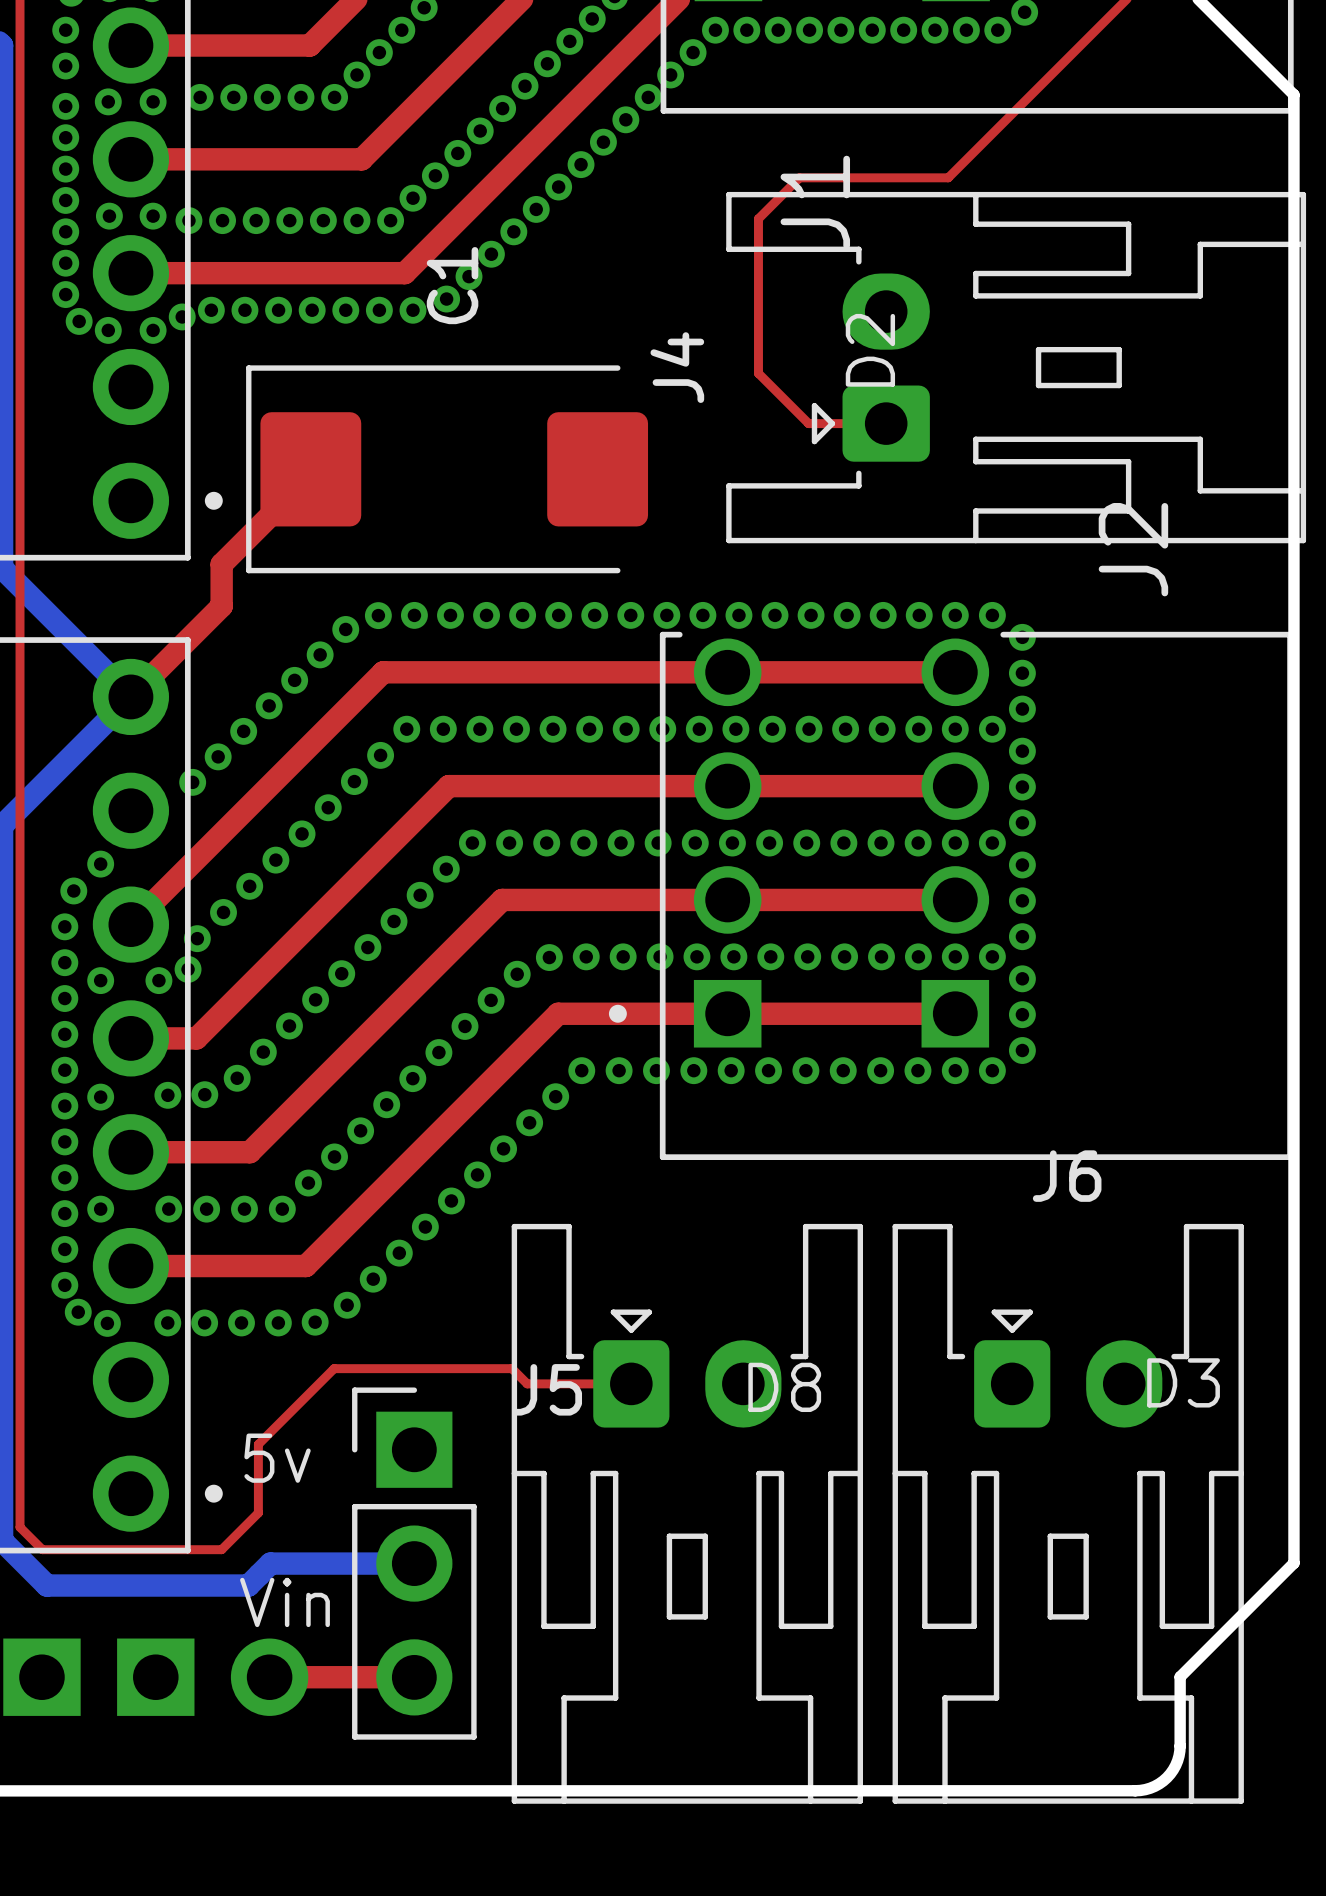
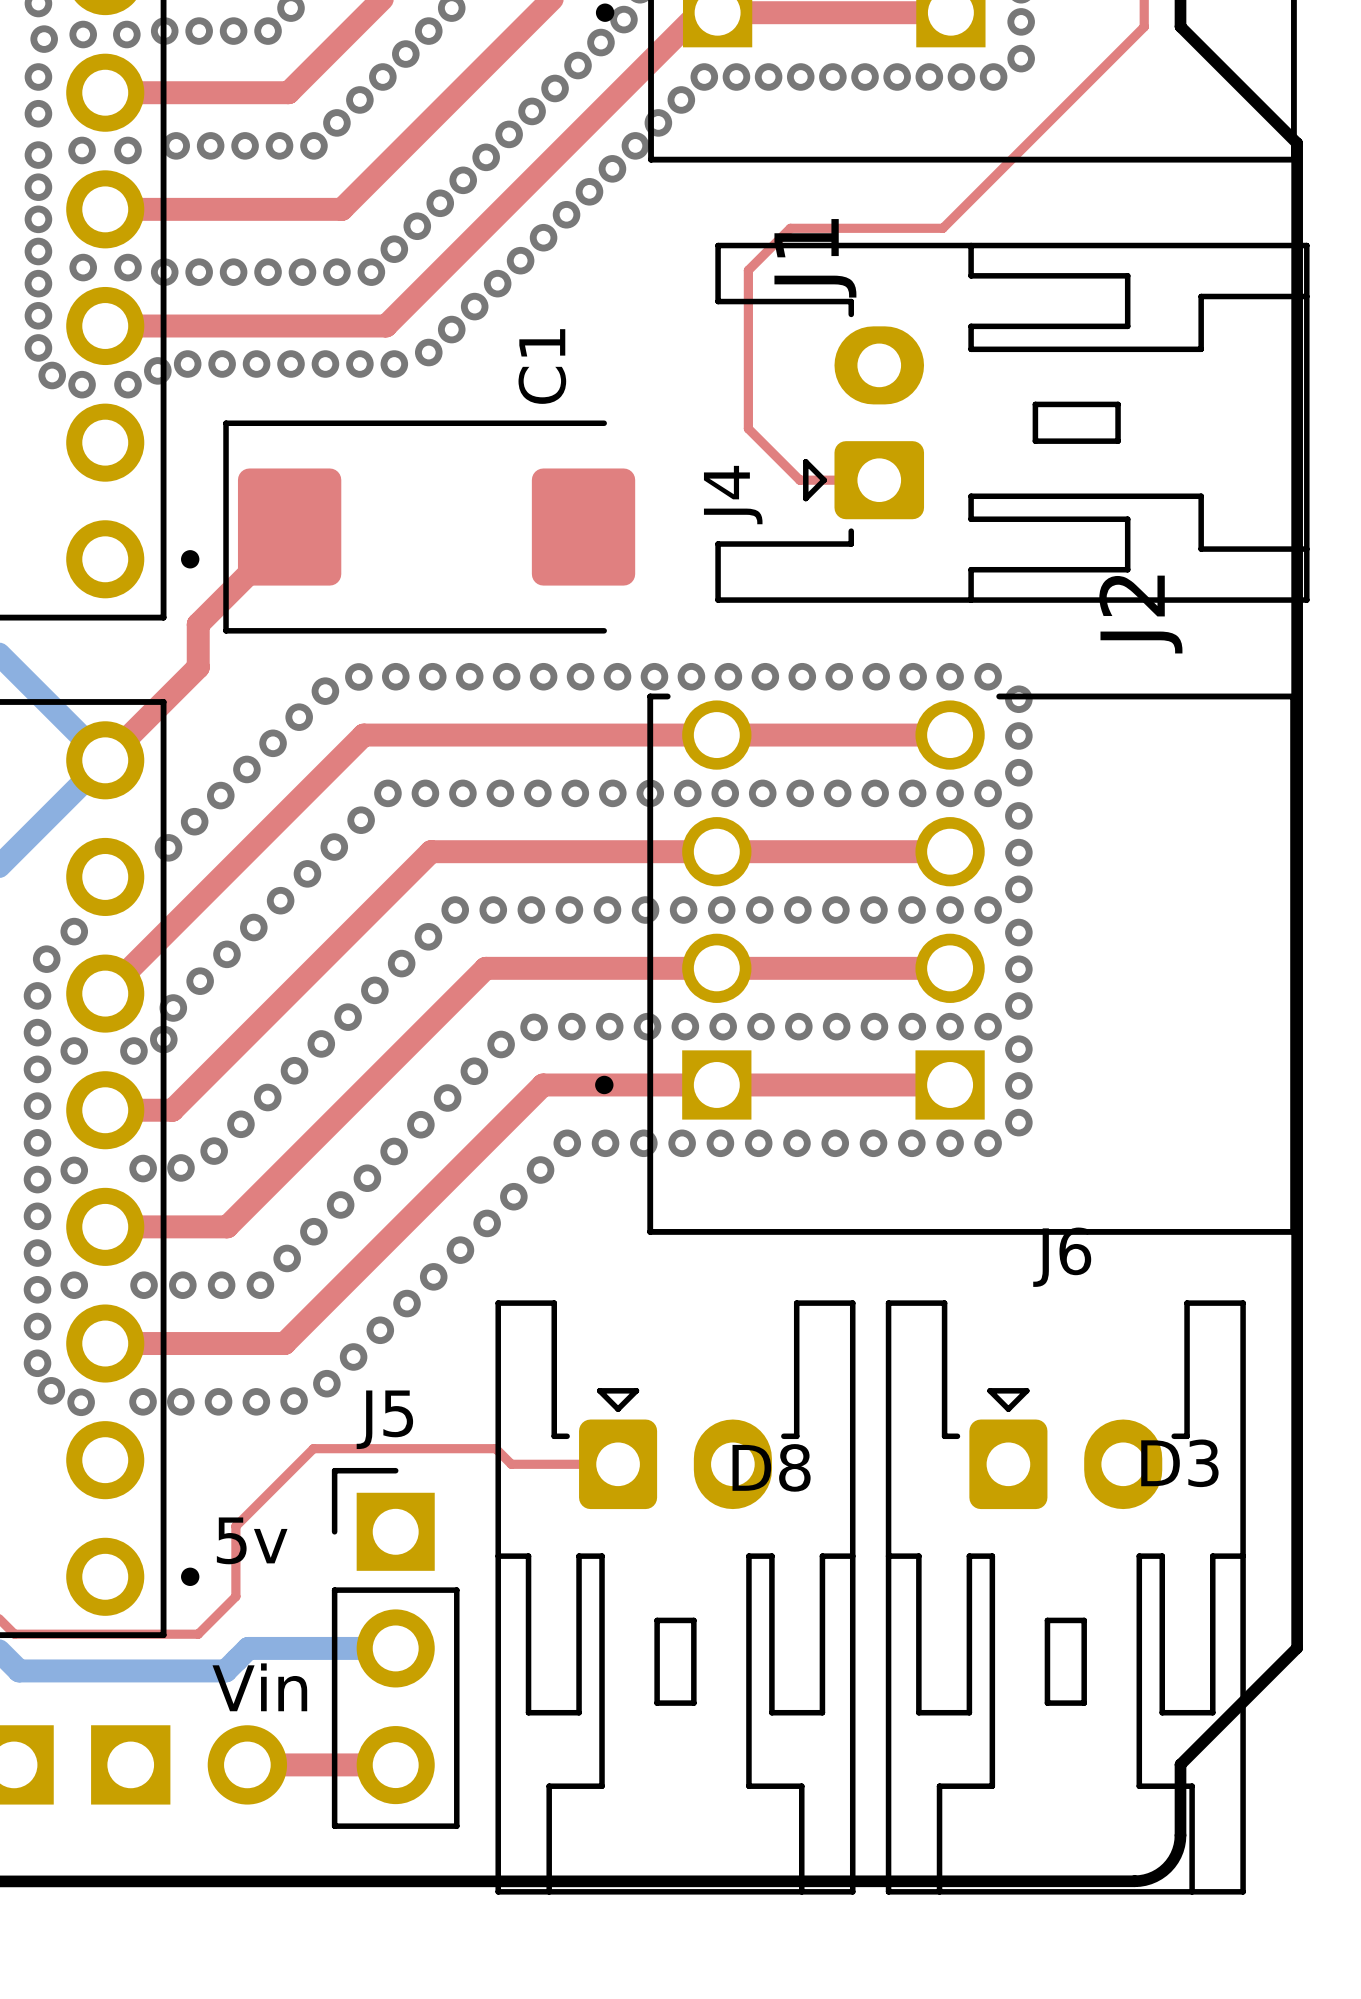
C1 name position: C1 (452, 285) -> C1 (542, 366)
text: D2 (870, 350) -> none
J4 name position: J4 (677, 367) -> J4 (733, 495)
J5 name position: J5 (547, 1389) -> J5 (384, 1419)

